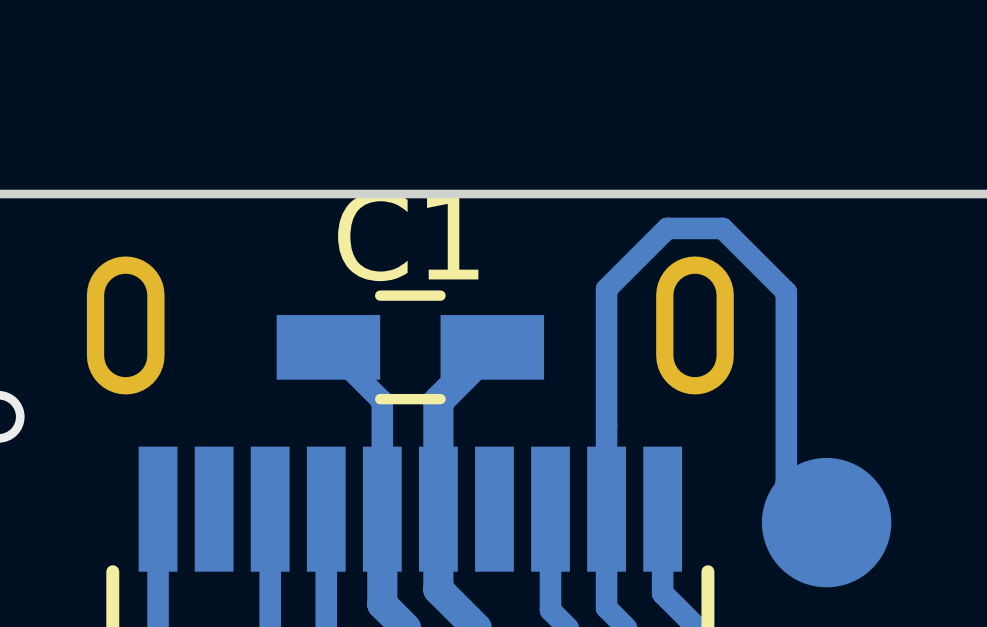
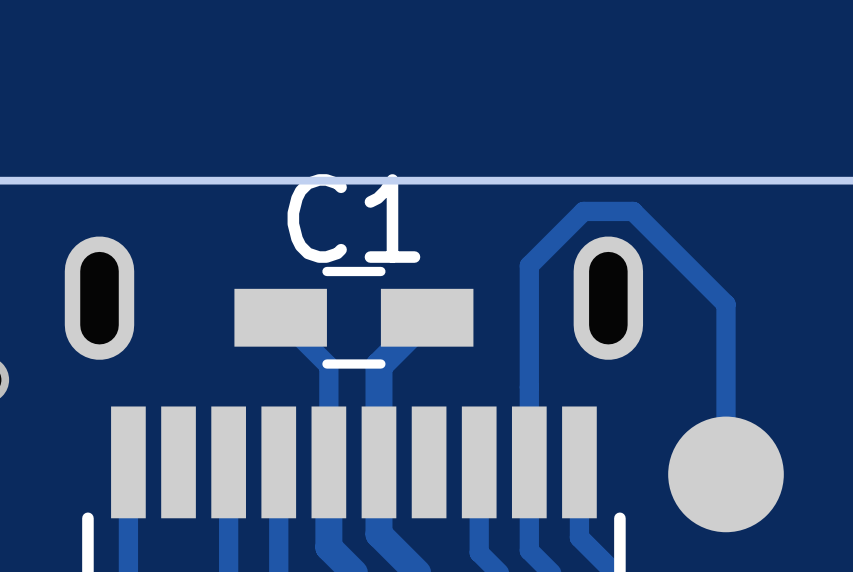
track: (786, 292) (786, 482) (826, 522) -> (689, 268) (726, 304) (726, 474)

